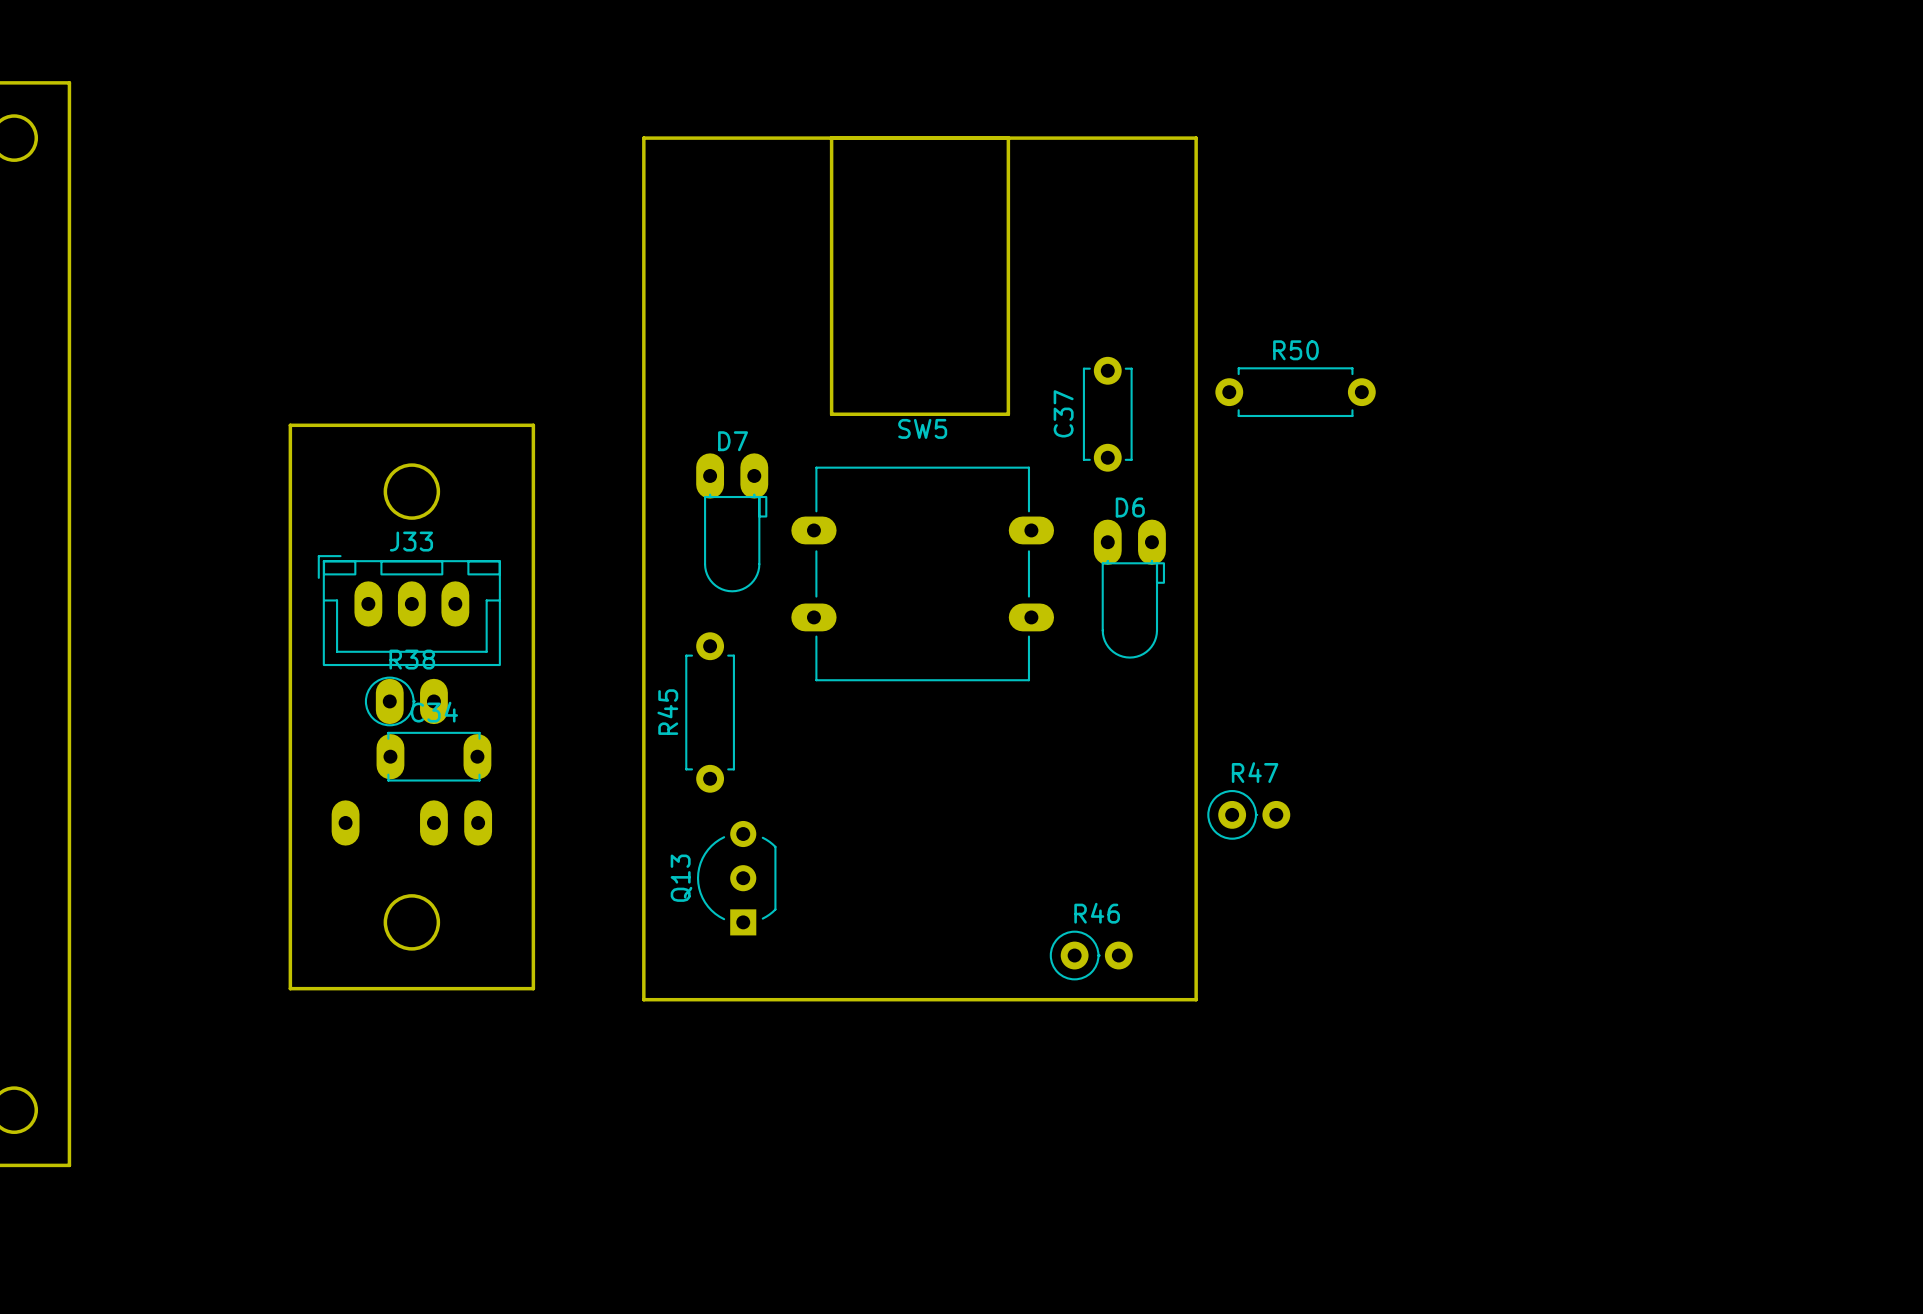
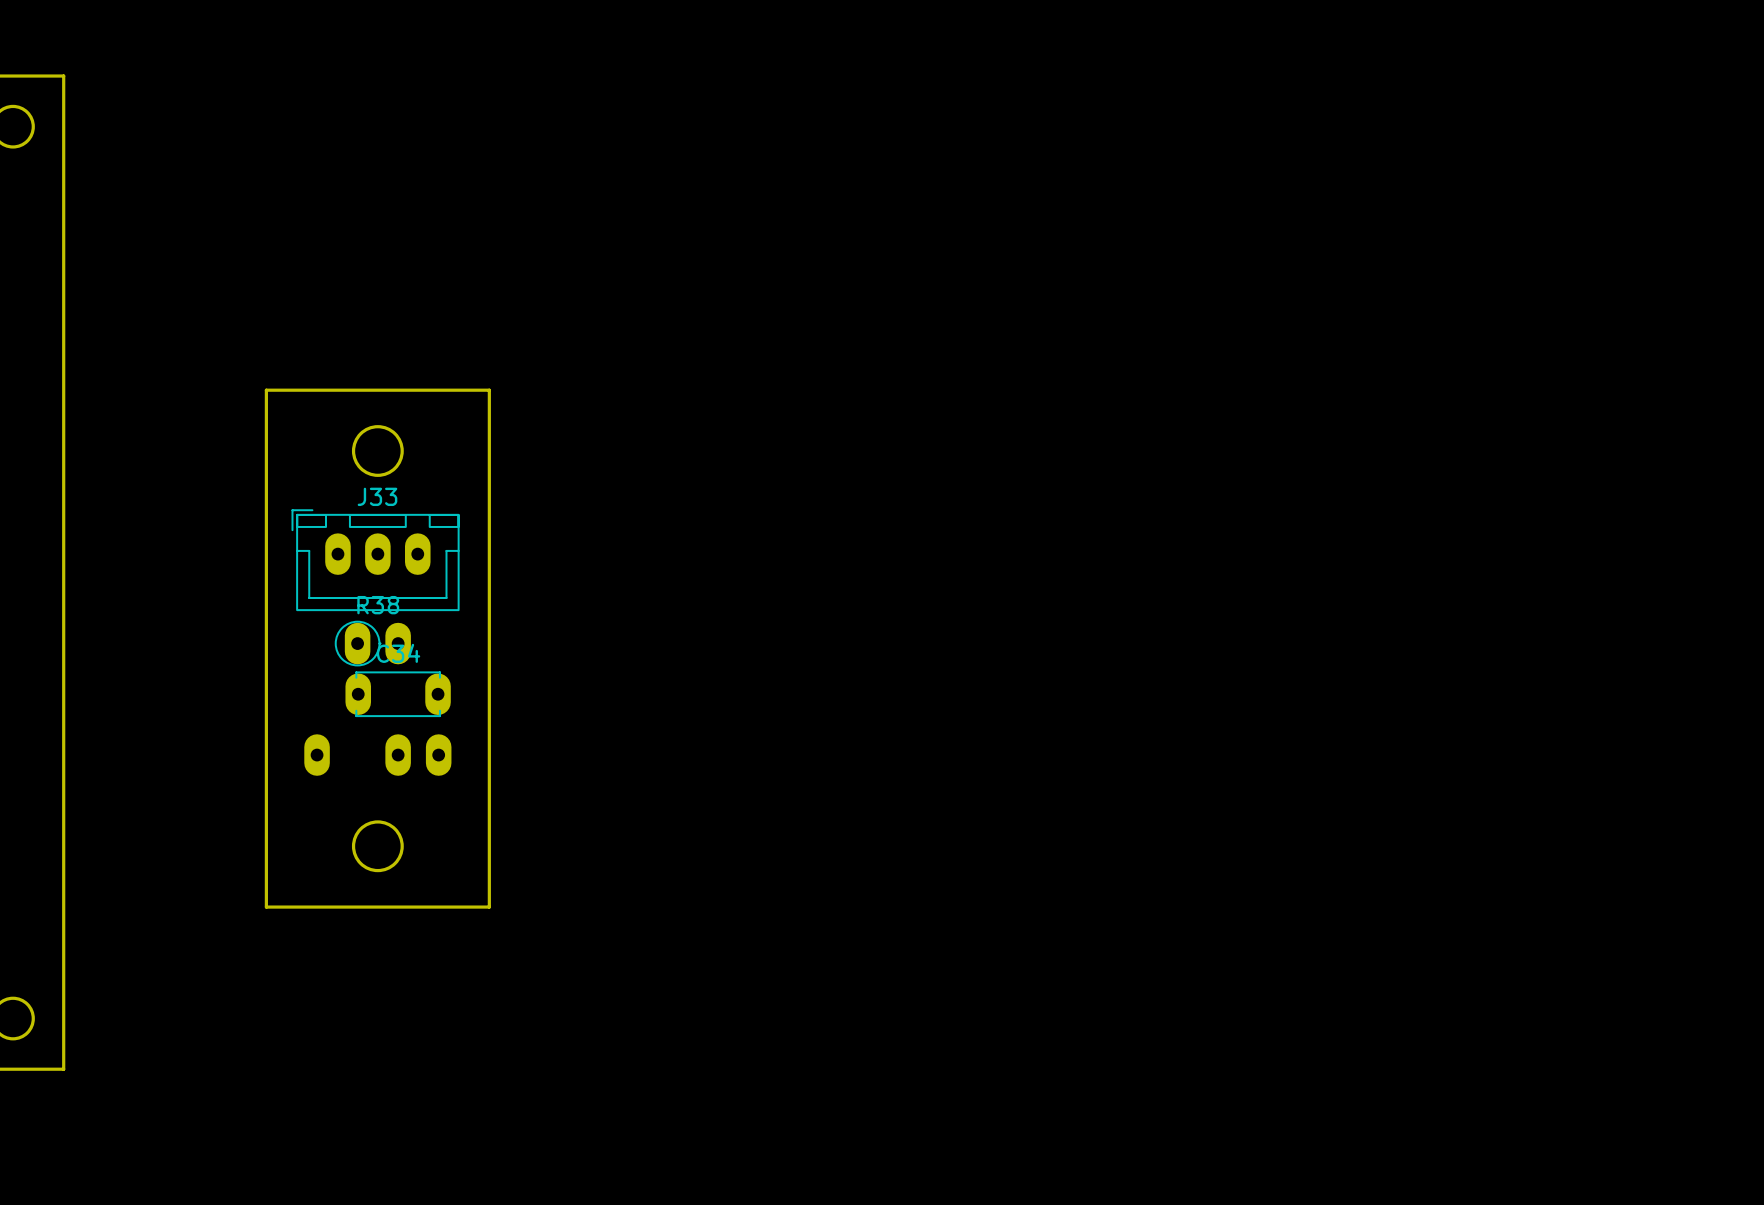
board edge: (643, 138) (1196, 138) (1196, 999) (643, 999) (643, 138) -> none
board edge: (831, 138) (831, 414) (1008, 414) (1008, 138) -> none
R50: (1295, 392) -> none
C37: (1107, 414) -> none
D7: (732, 522) -> none
SW5: (922, 573) -> none
D6: (1129, 589) -> none
R45: (710, 712) -> none
R47: (1248, 814) -> none
Q13: (736, 878) -> none
R46: (1091, 955) -> none

